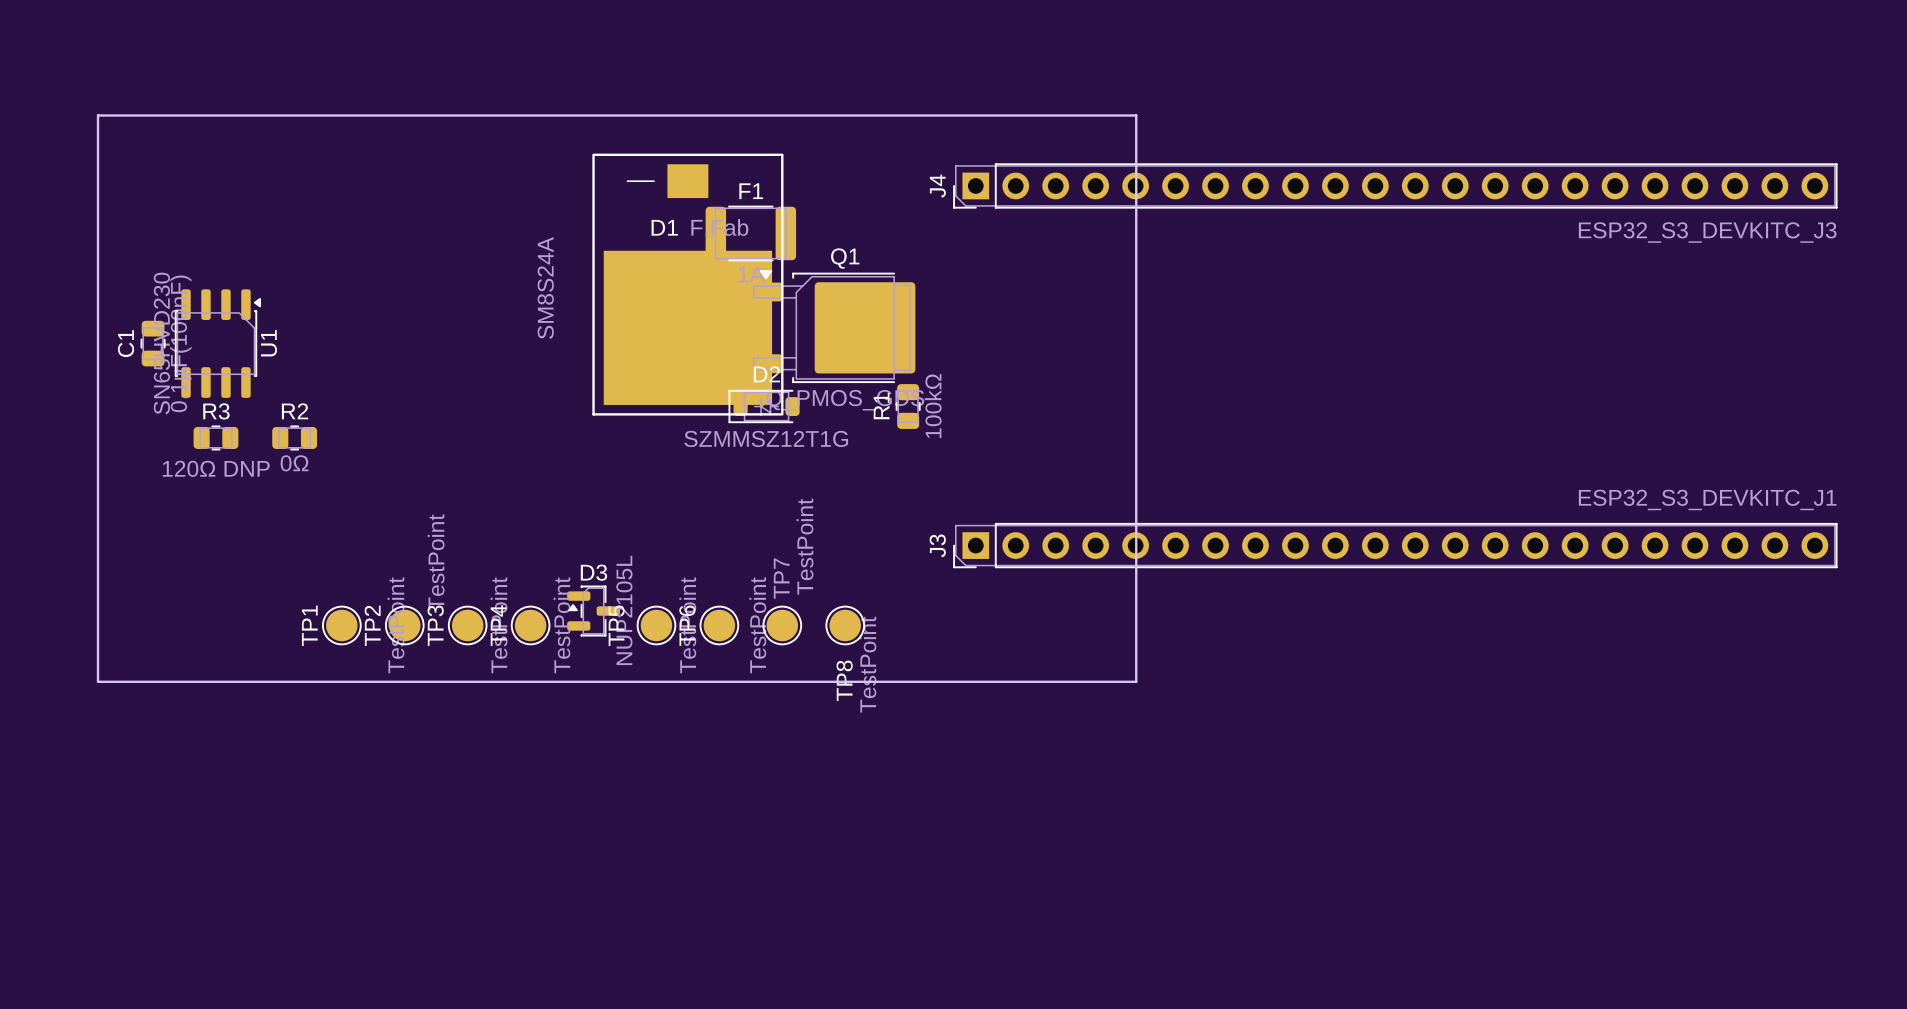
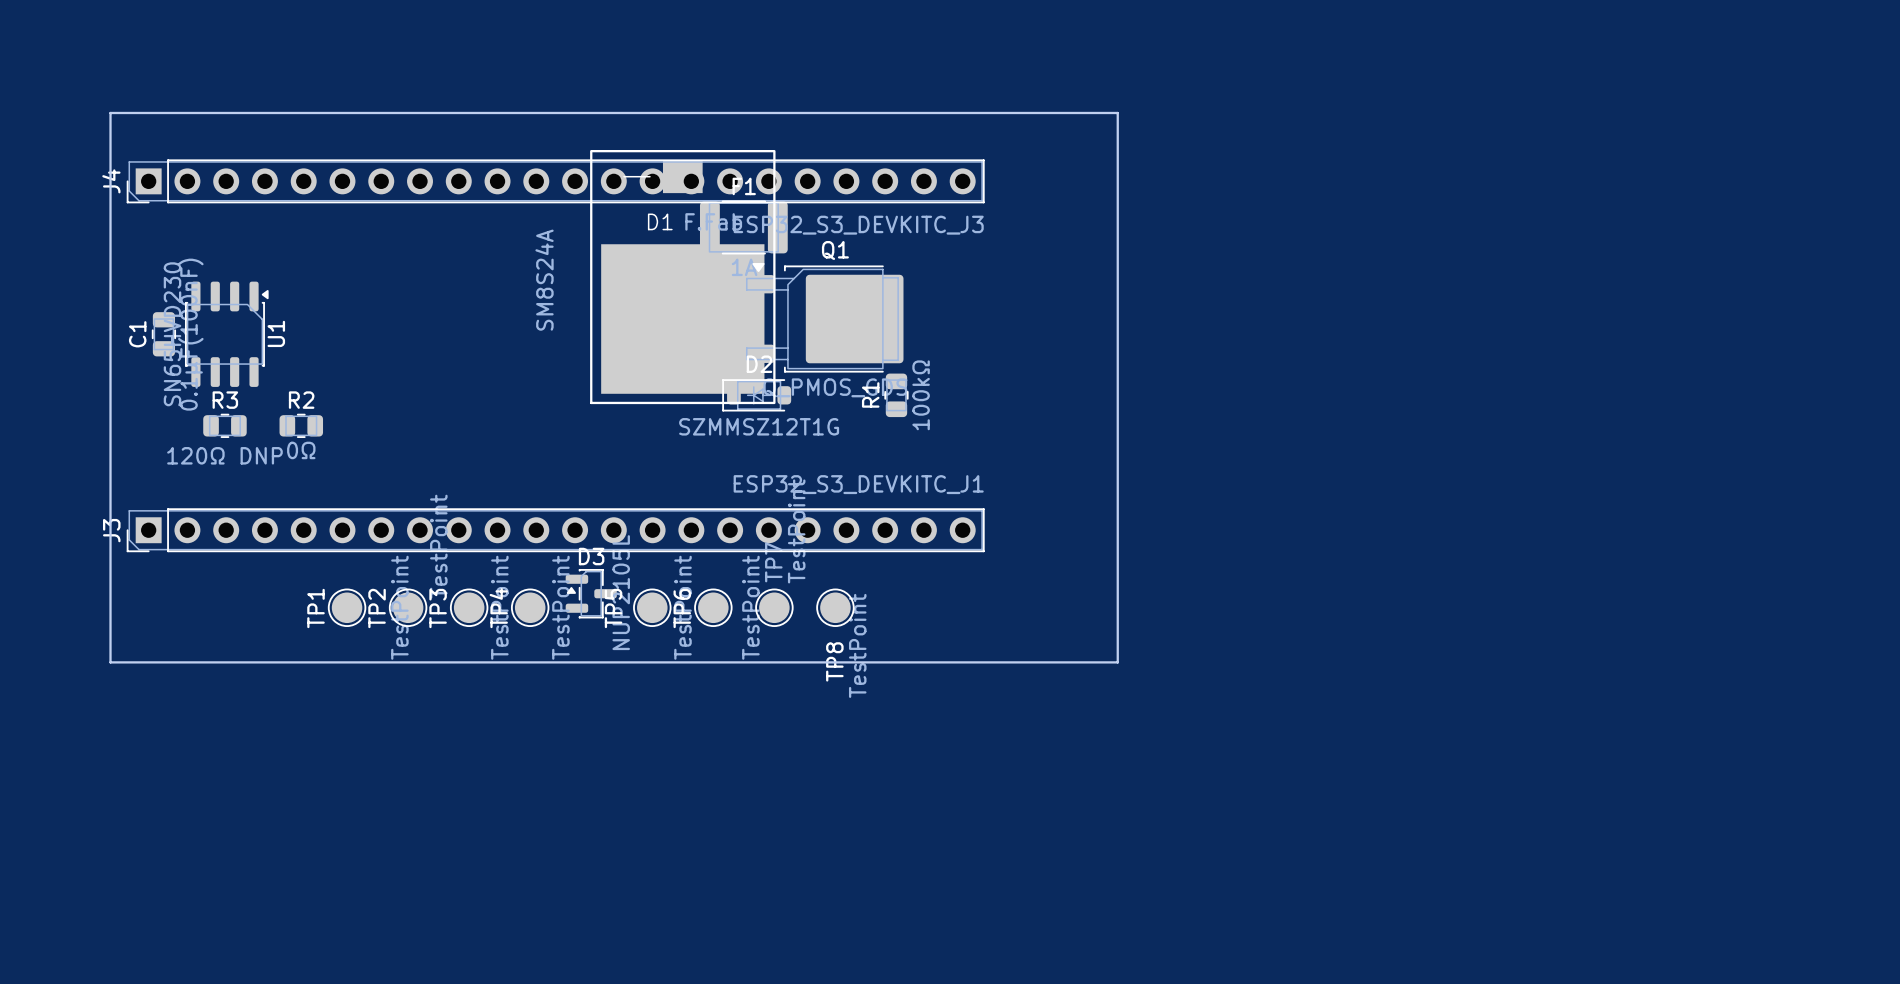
J4 position: (1395, 185) -> (555, 181)
J3 position: (1395, 545) -> (555, 530)

